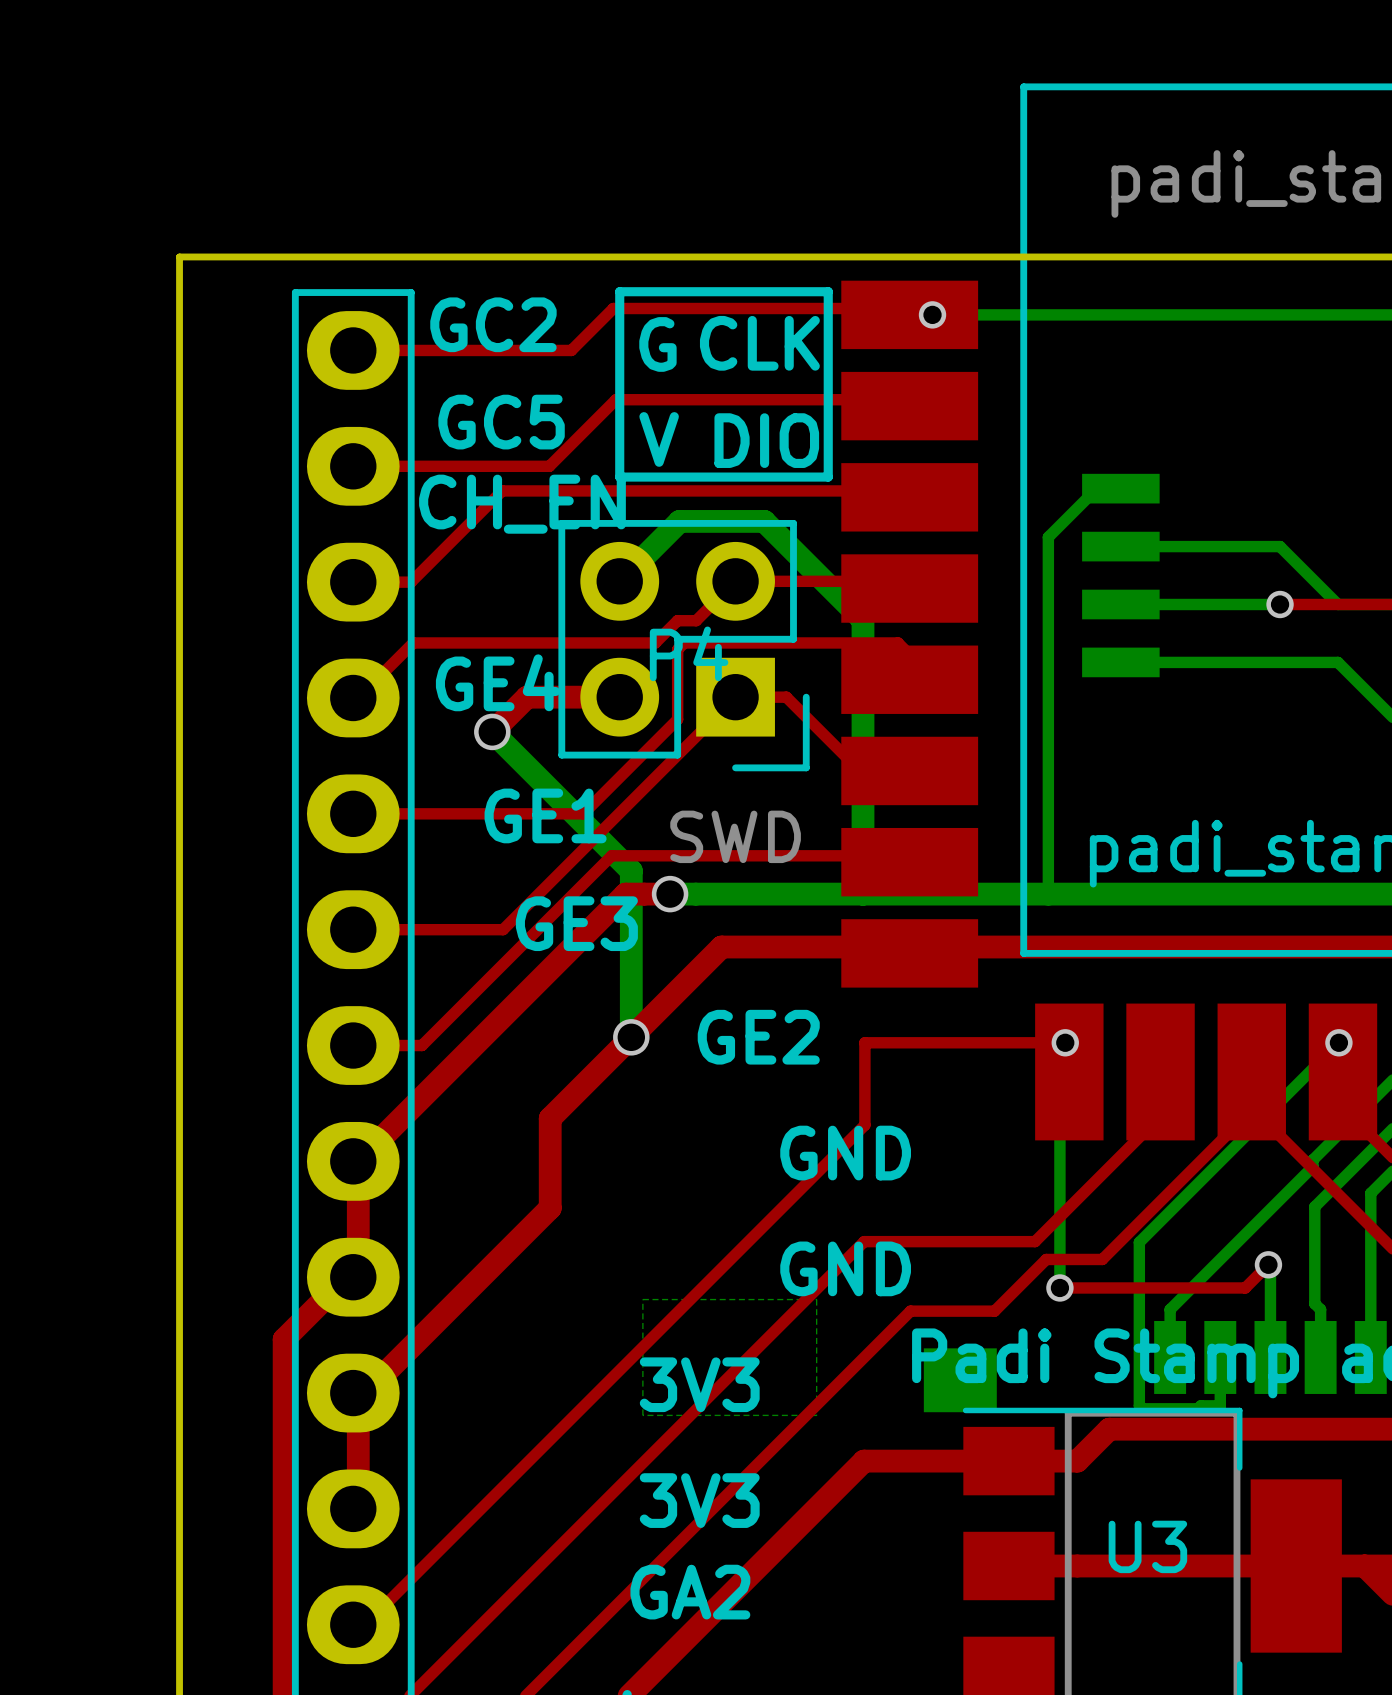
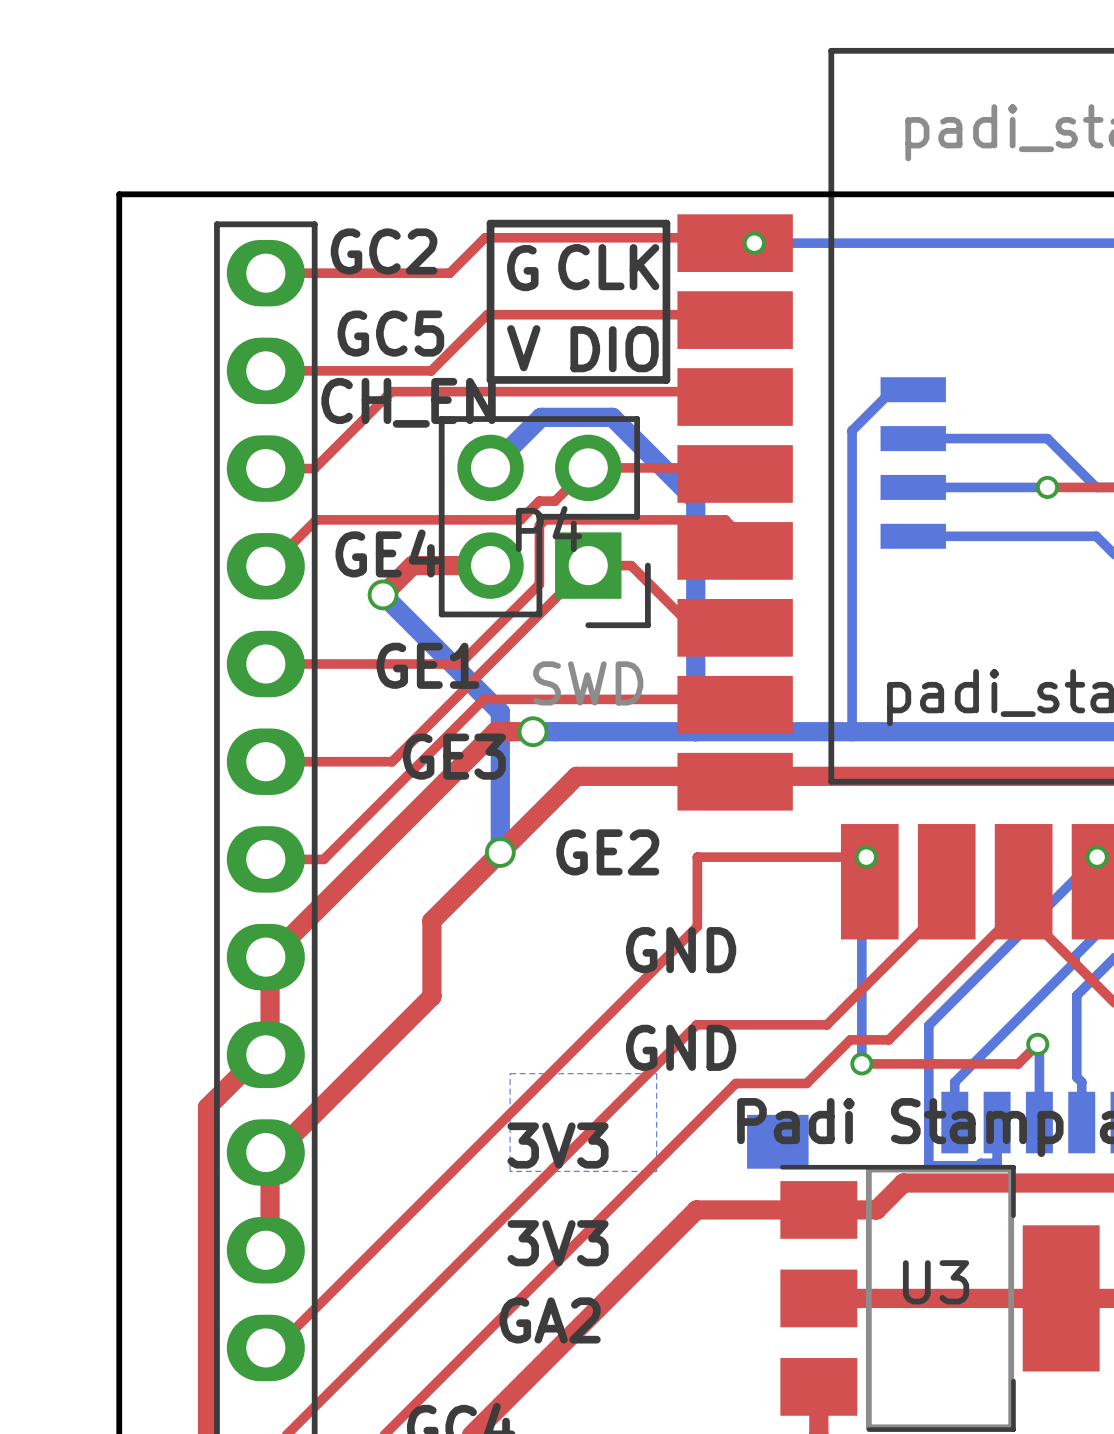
top track: (1160, 1049) (1160, 1116) (1035, 1241) (1018, 1241) -> (943, 908) (826, 1024)
top track: (1251, 1049) (1251, 1110) (1102, 1259) (1091, 1259) -> (1020, 908) (888, 1039)

